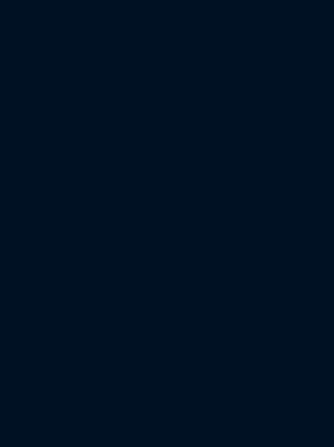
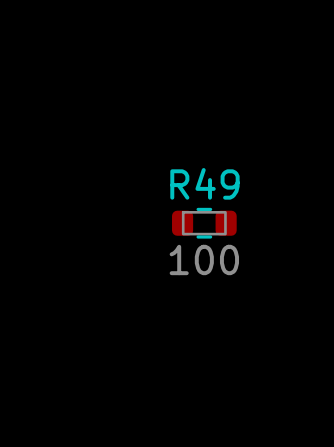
R49: none -> 100 (204, 223)

